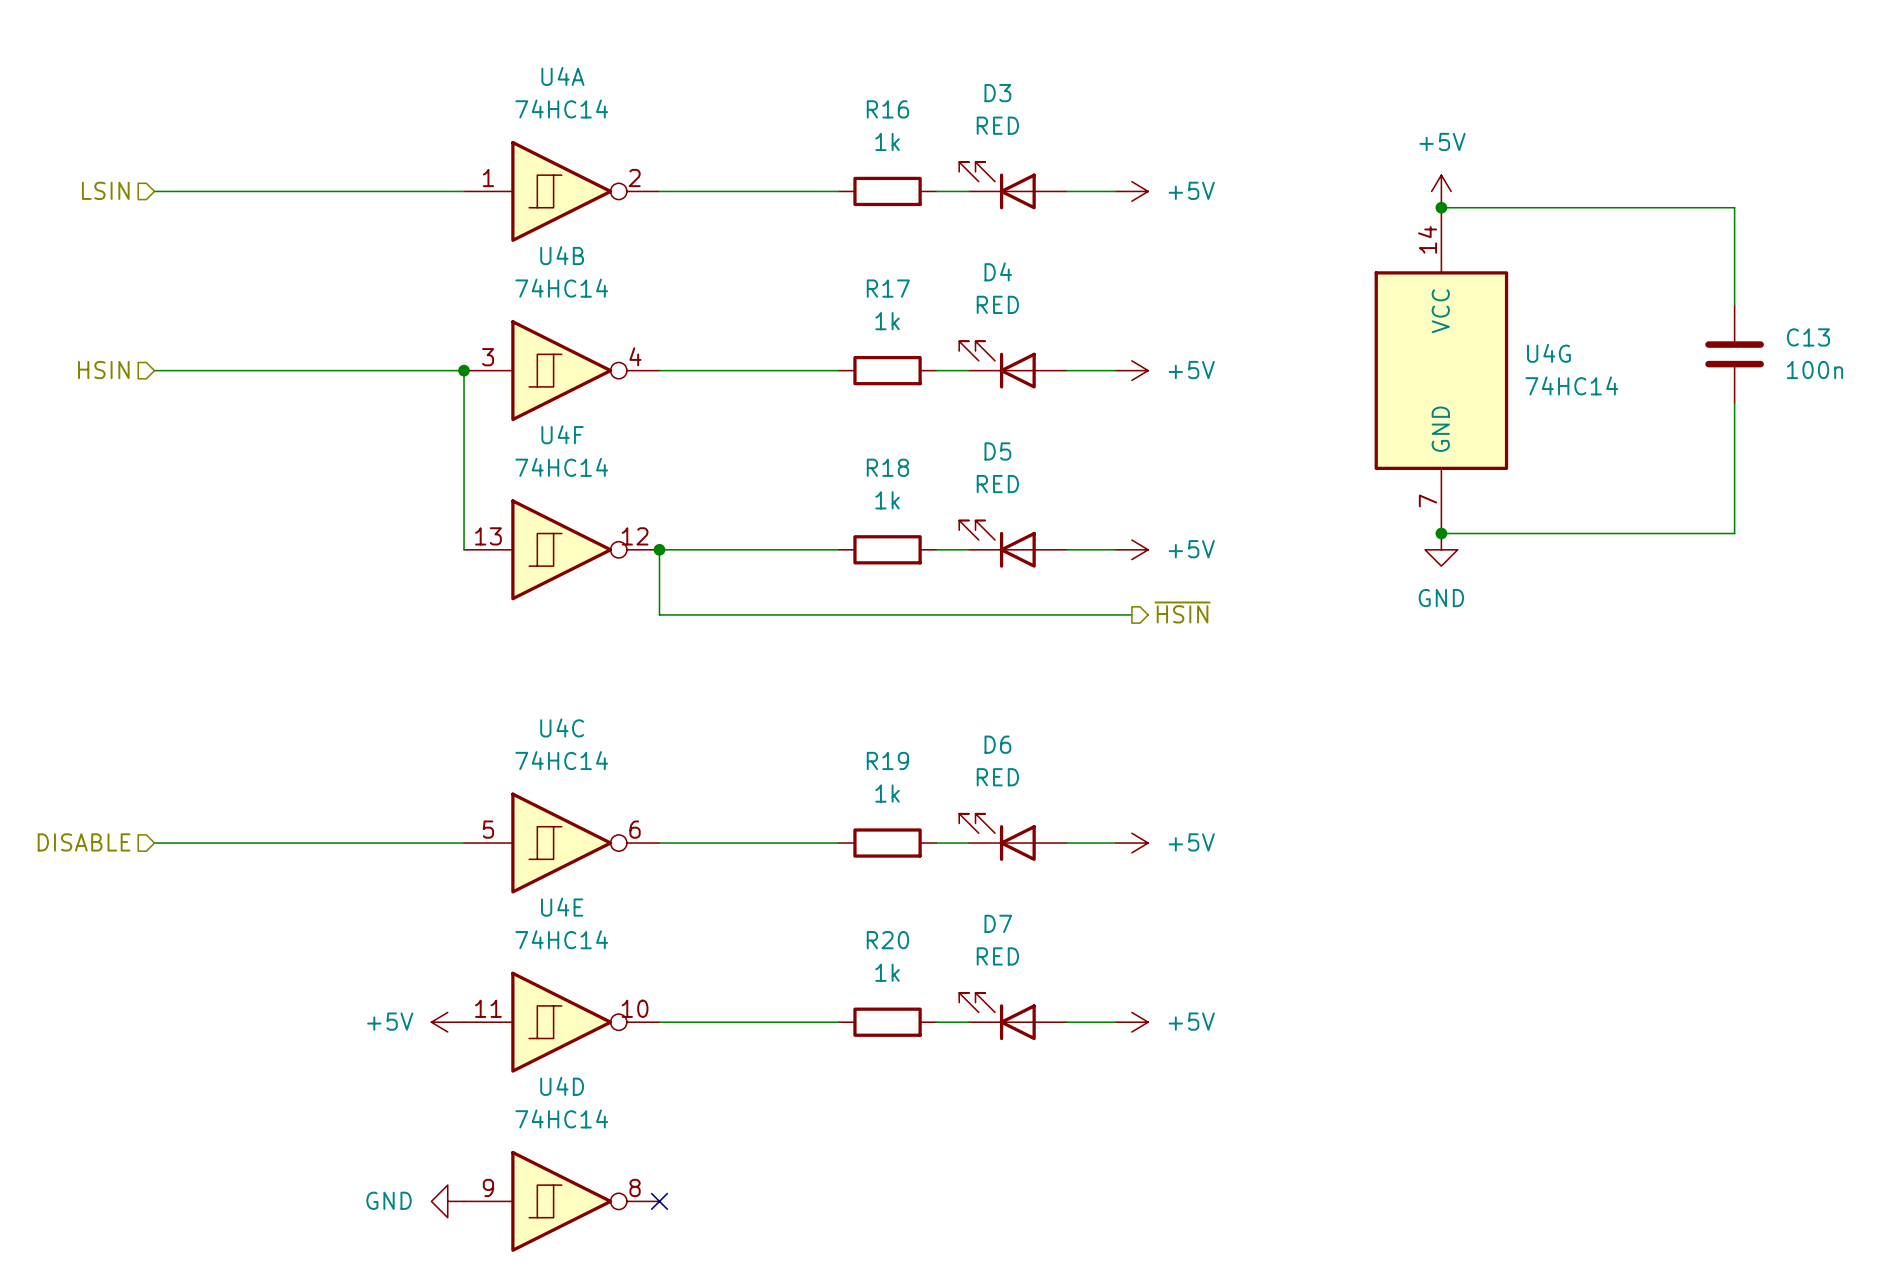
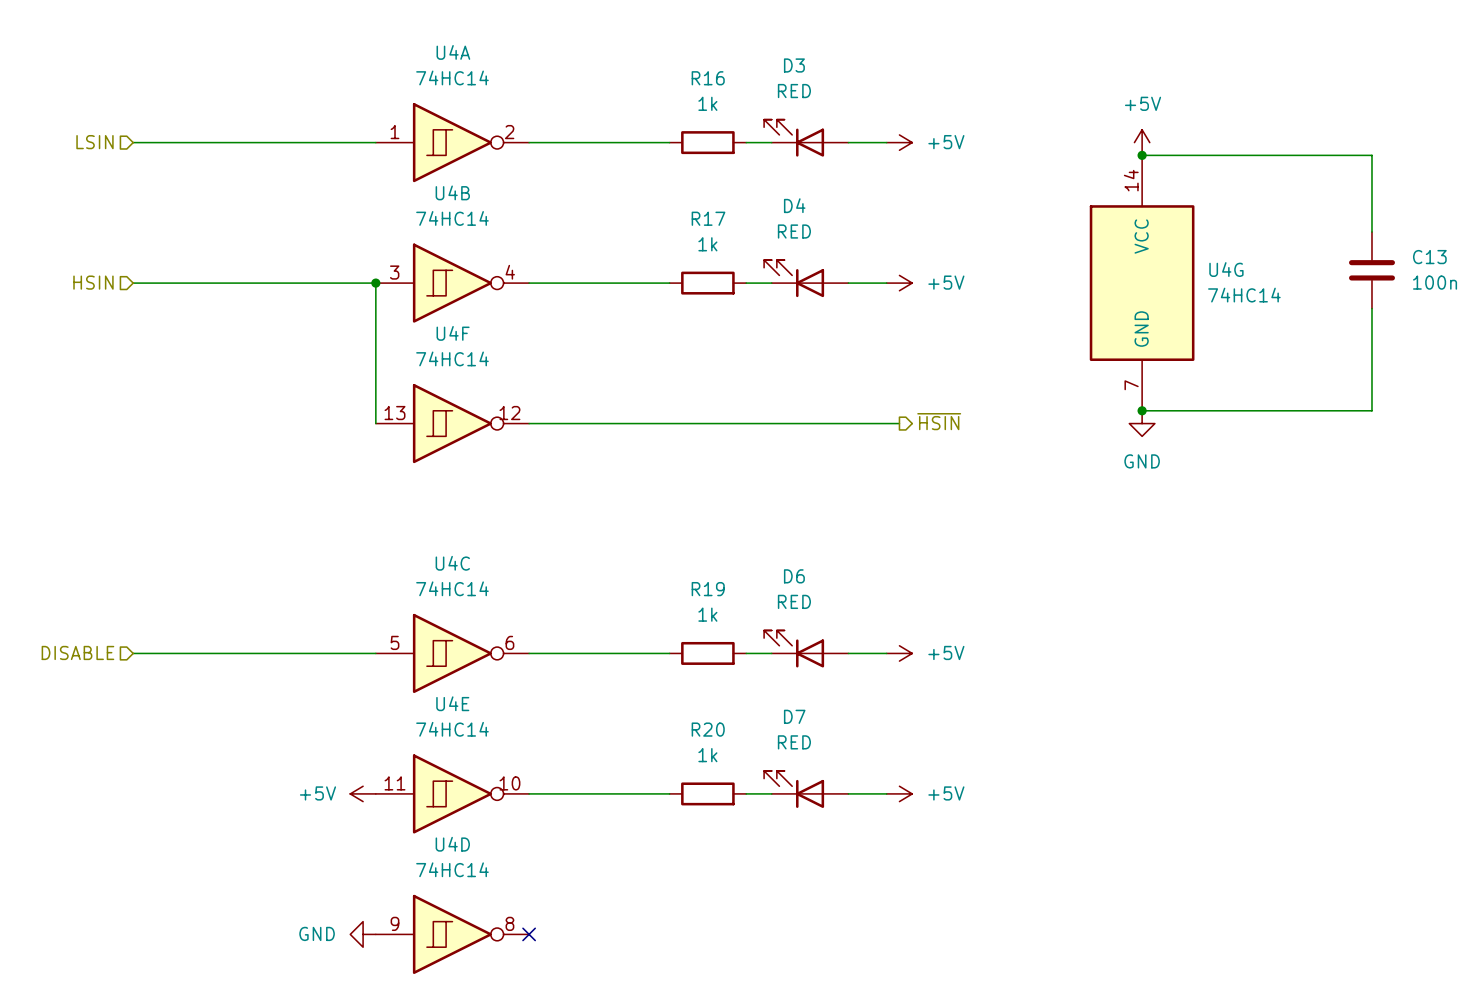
D5: RED (1012, 544) -> none
wire: (659, 549) (659, 614) (1131, 614) -> none
junction: (659, 549) -> none
wire: none -> (669, 423) (746, 423)
R18: 1k (887, 549) -> none
power symbol: +5V (1131, 549) -> none
hierarchical label position: ~{HSIN} (1182, 612) -> ~{HSIN} (939, 421)

